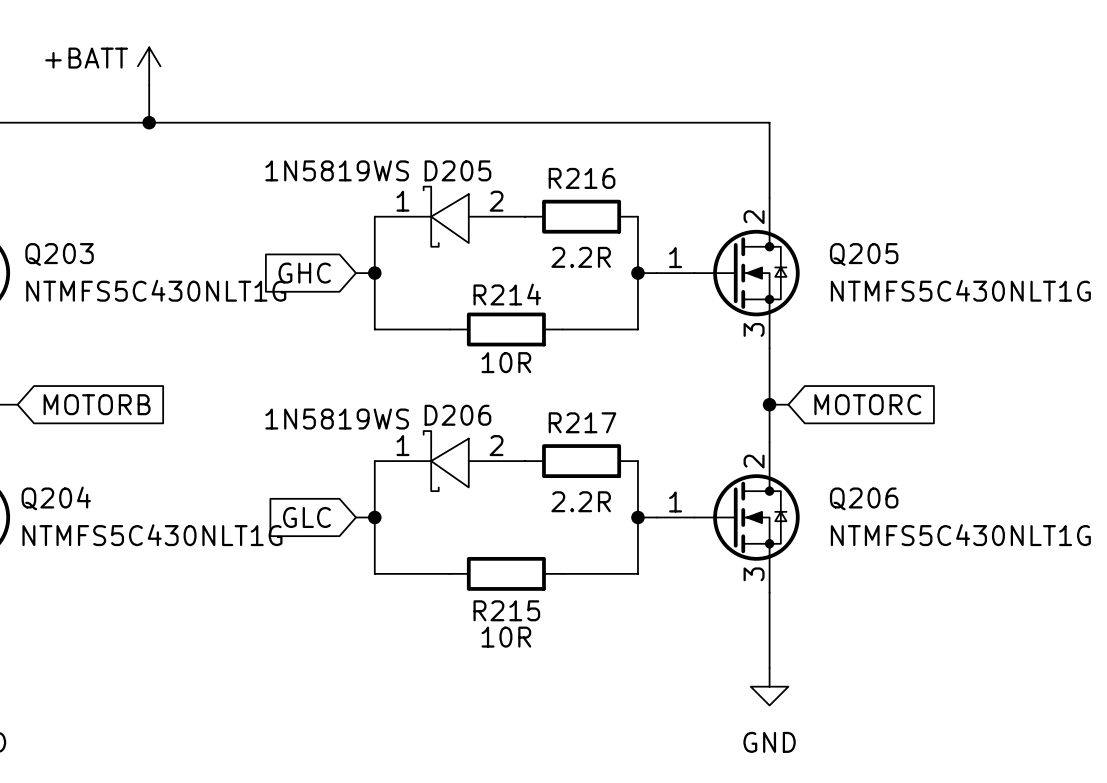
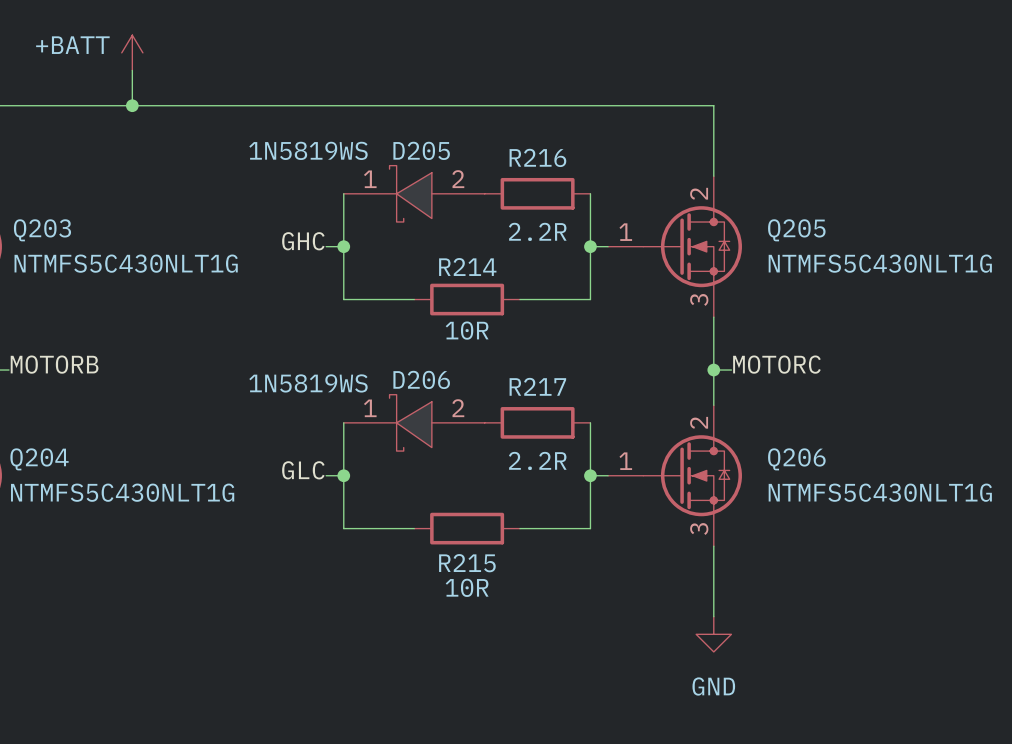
label: none -> GHC (303, 241)
global label: GHC (304, 273) -> none
label: none -> MOTORB (54, 364)
label: none -> MOTORC (776, 364)
global label: MOTORB (97, 404) -> none
global label: MOTORC (867, 404) -> none
label: none -> GLC (303, 470)
global label: GLC (306, 517) -> none

